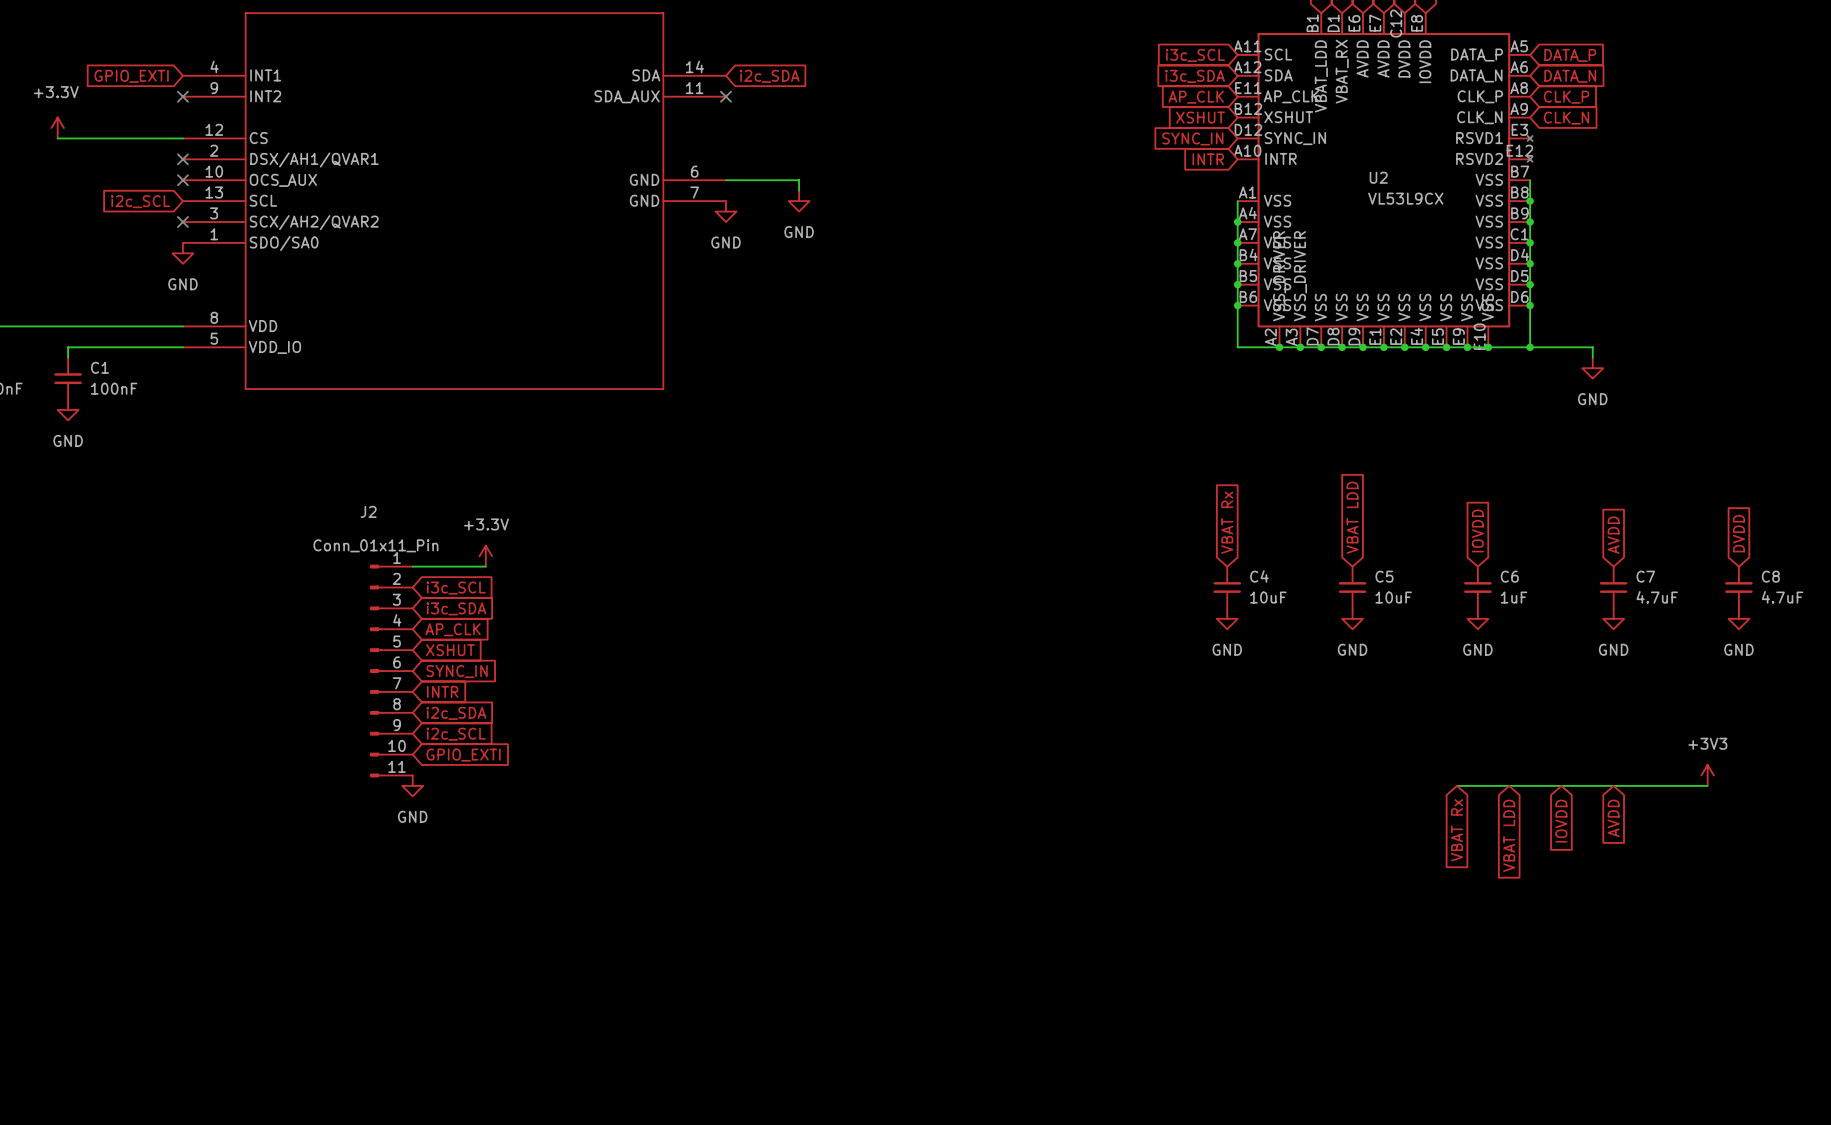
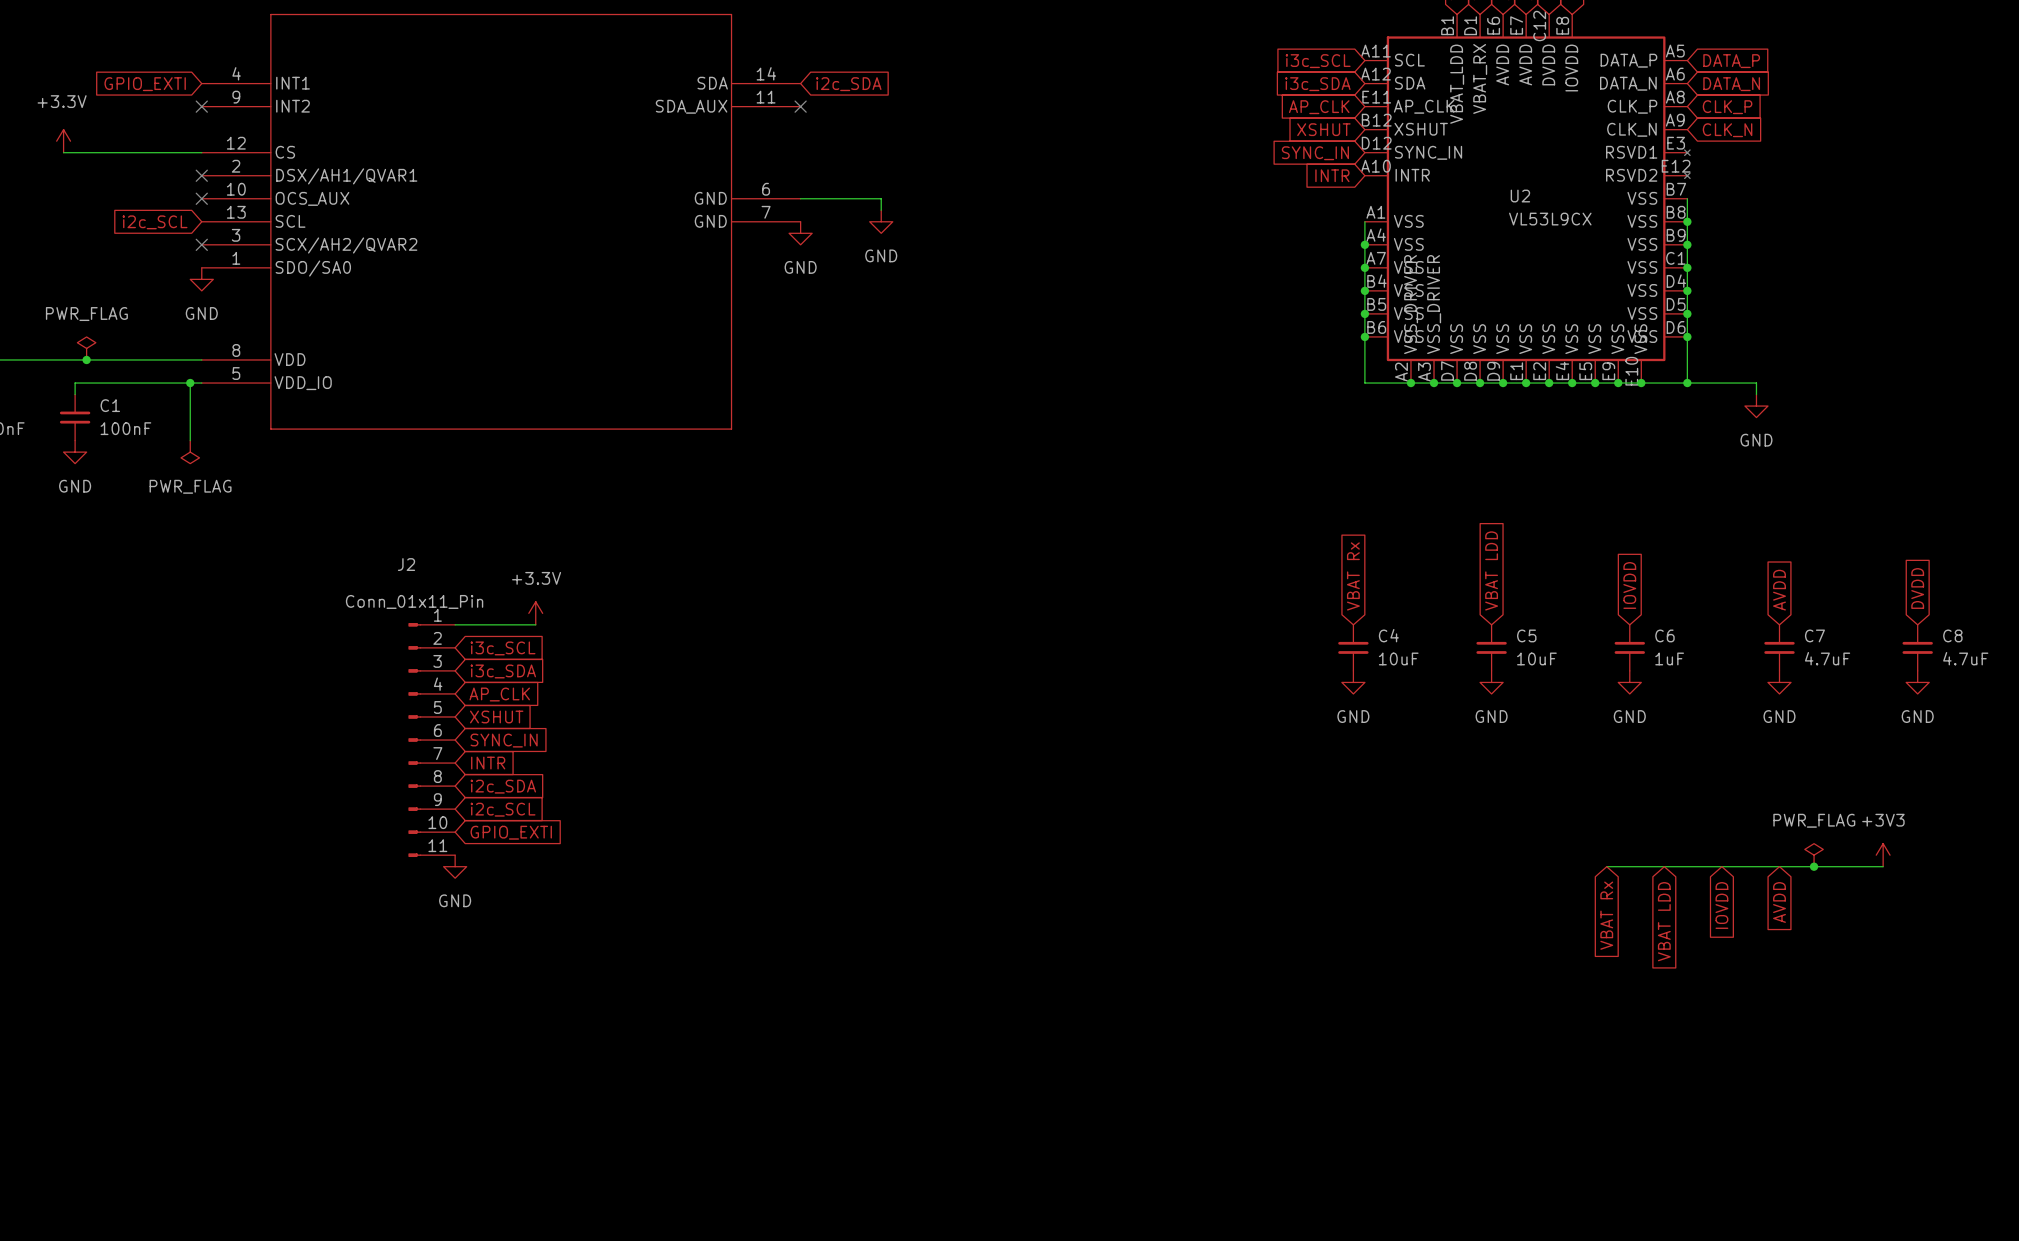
power symbol: none -> PWR_FLAG (86, 348)
junction: none -> (86, 359)
wire: none -> (190, 383) (190, 440)
junction: none -> (190, 383)
power symbol: none -> PWR_FLAG (190, 452)
power symbol: none -> PWR_FLAG (1814, 855)
junction: none -> (1814, 866)

